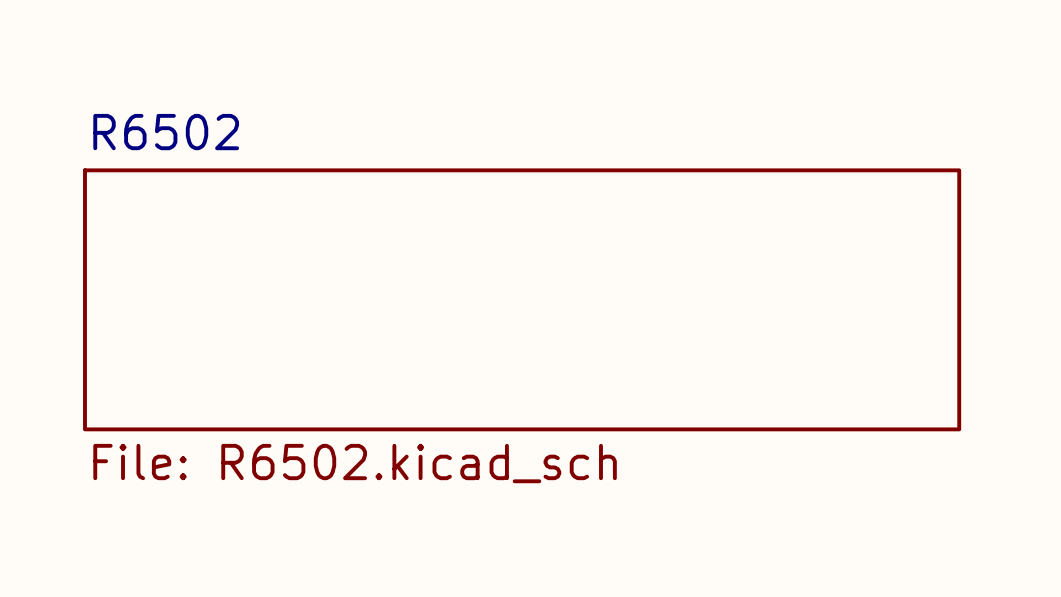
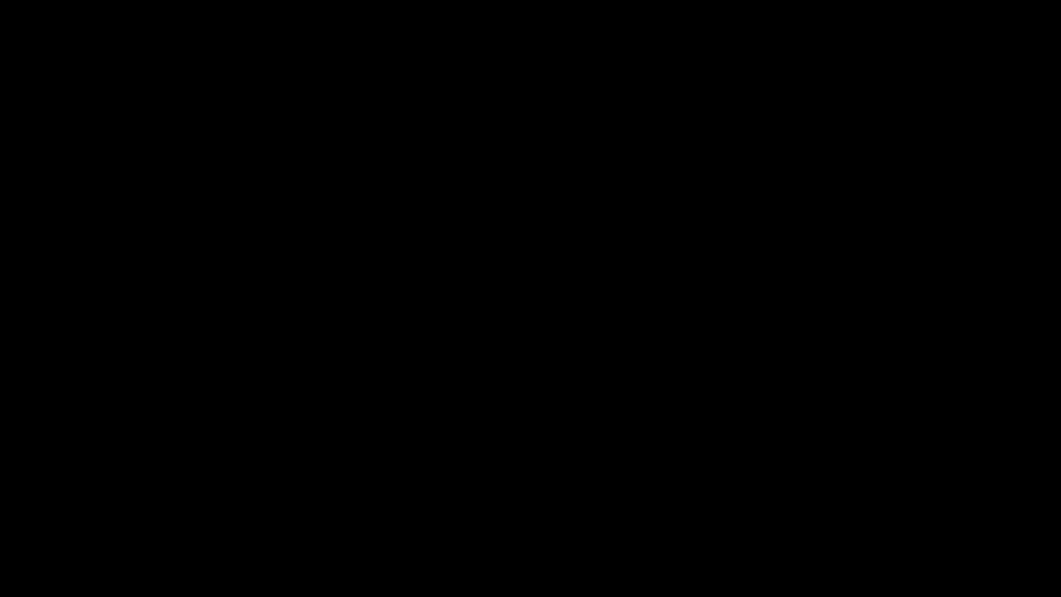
sheet R6502: File: R6502.kicad_sch (522, 299) -> none

